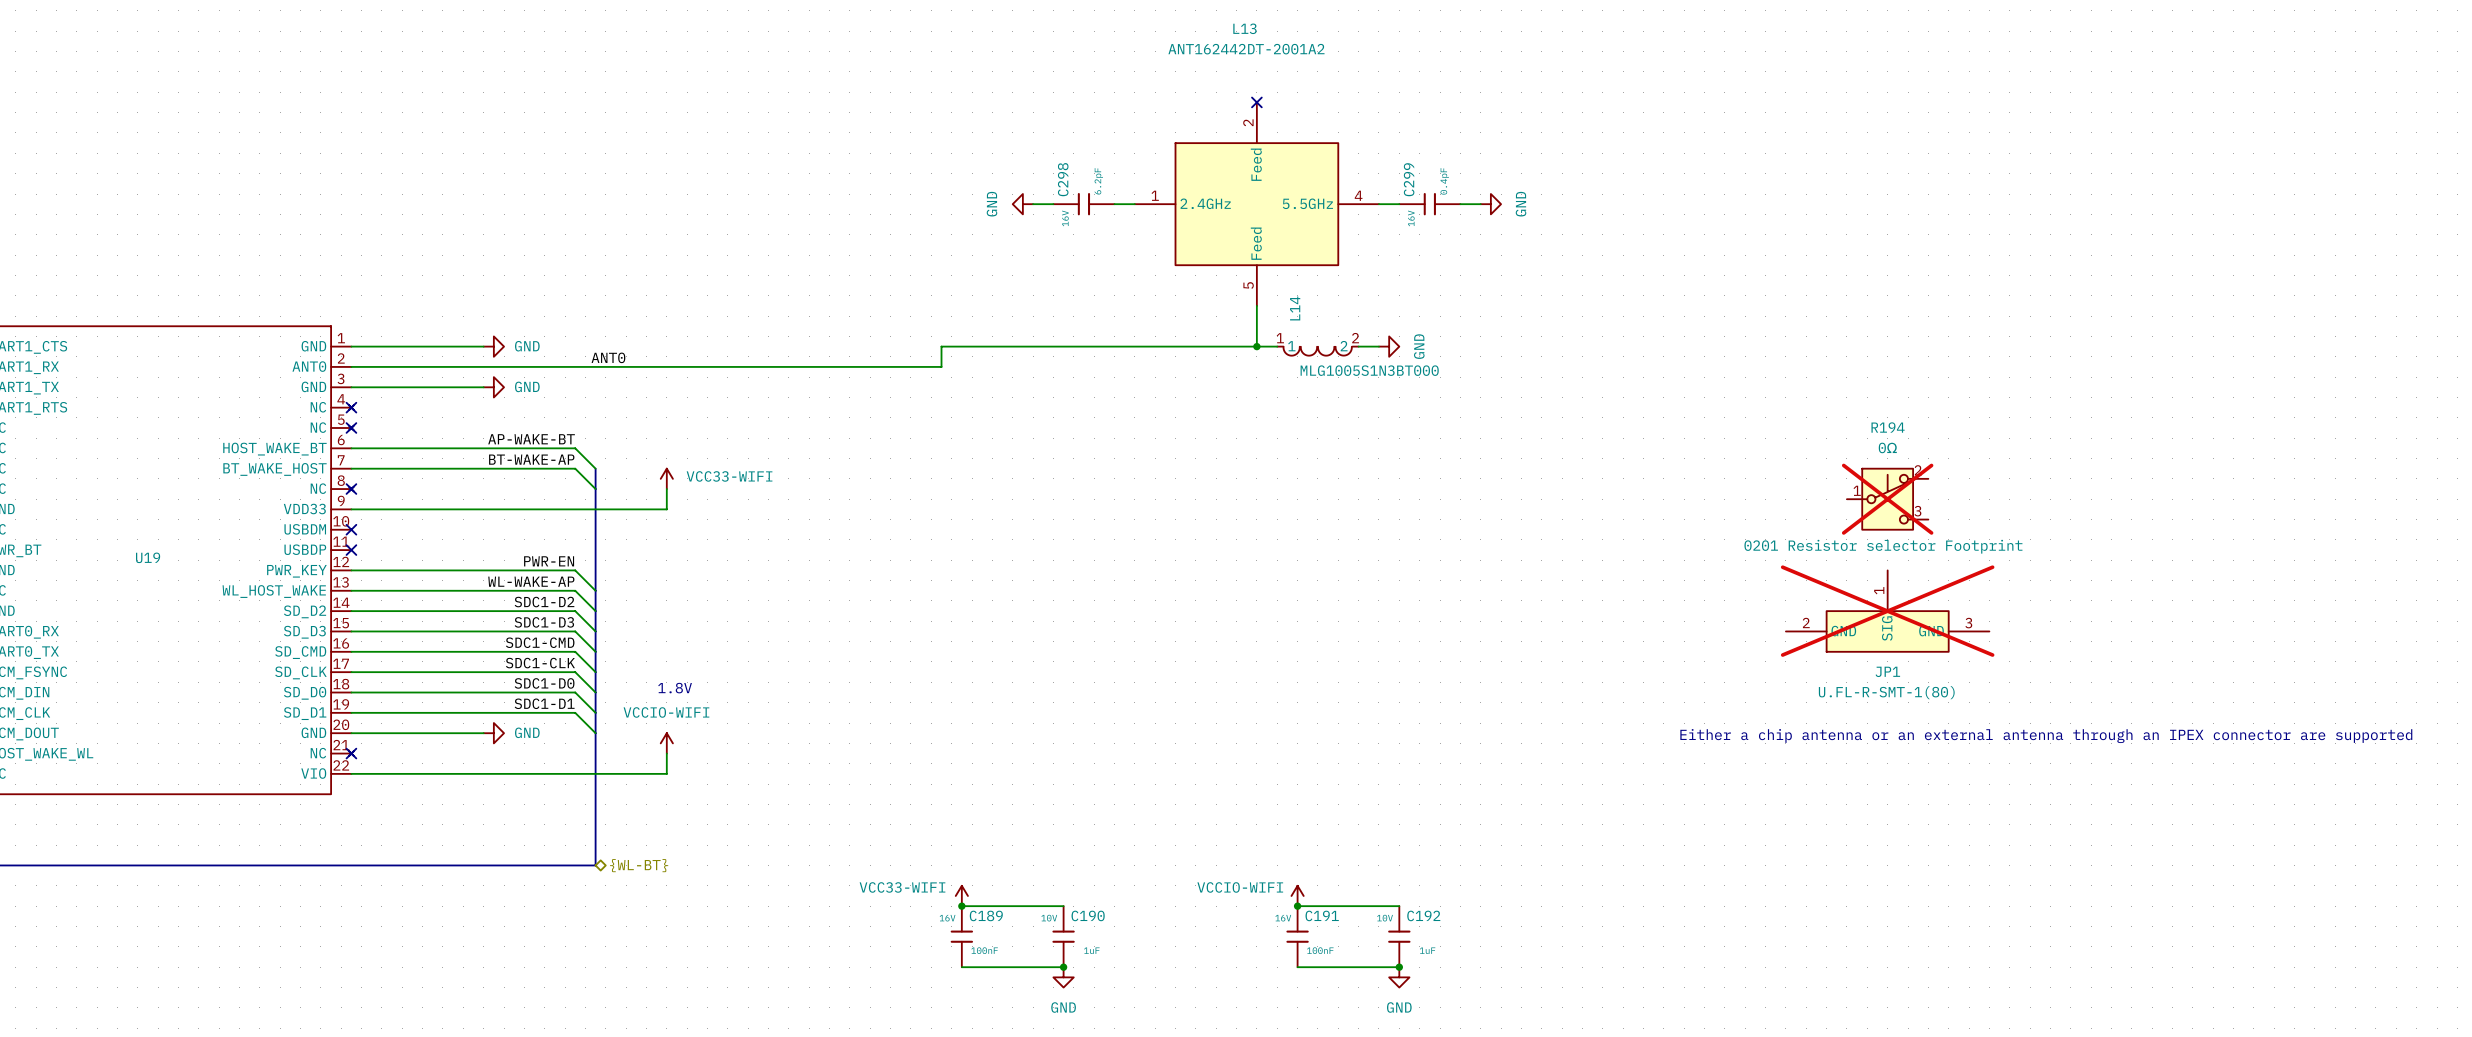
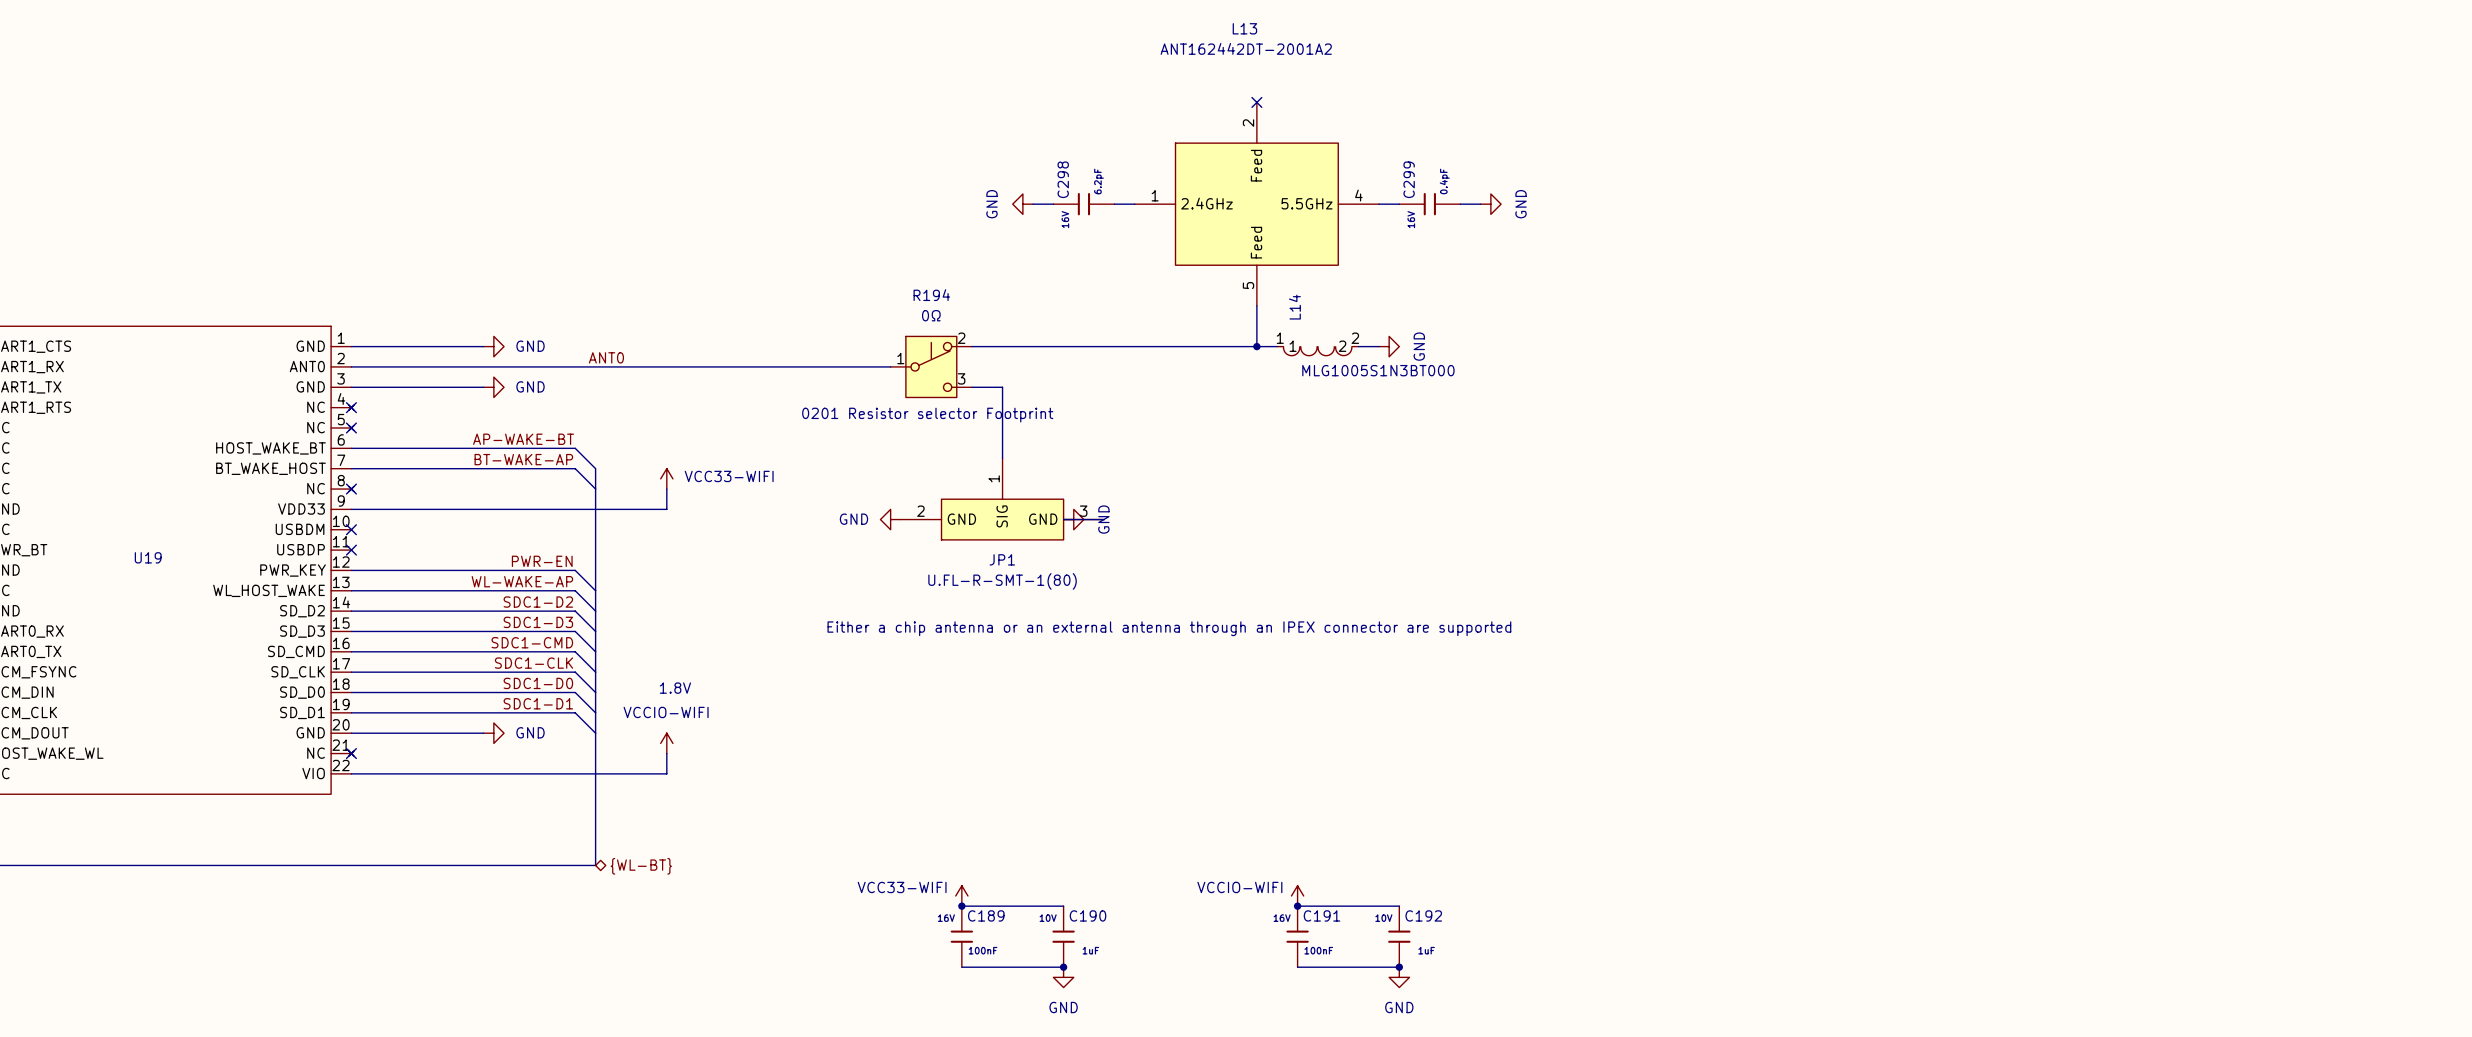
wire: none -> (972, 387) (1002, 387) (1002, 458)
R194 position: (1887, 499) -> (931, 366)
R194 do-not-place cross: (1887, 499) -> none
power symbol: none -> GND (890, 519)
wire: none -> (1063, 519) (1104, 519)
power symbol: none -> GND (1073, 519)
JP1 position: (1887, 611) -> (1002, 499)
JP1 do-not-place cross: (1887, 611) -> none
text: none -> Either a chip antenna or an external antenna through an IPEX connector are supported (1169, 628)
text: Either a chip antenna or an external antenna through an IPEX connector are supported (2046, 736) -> none

